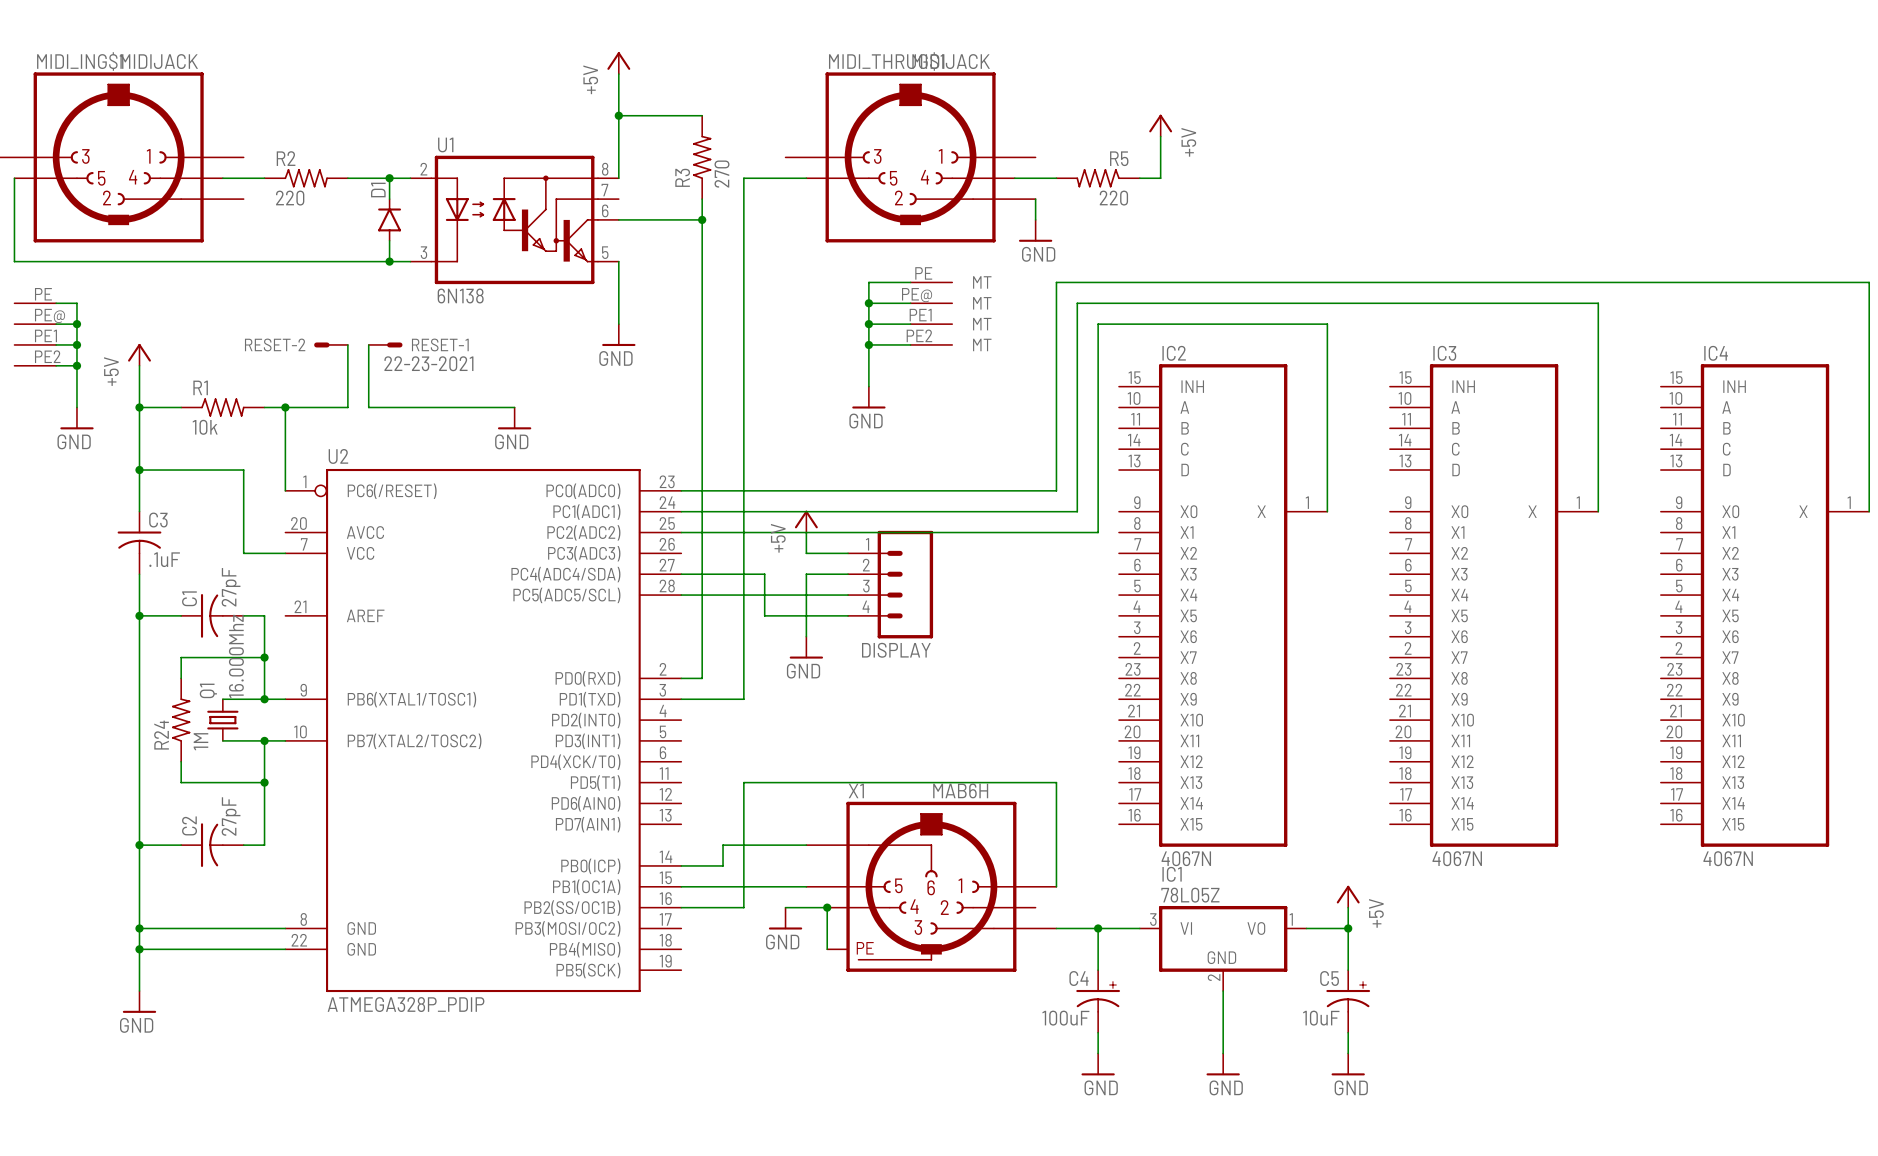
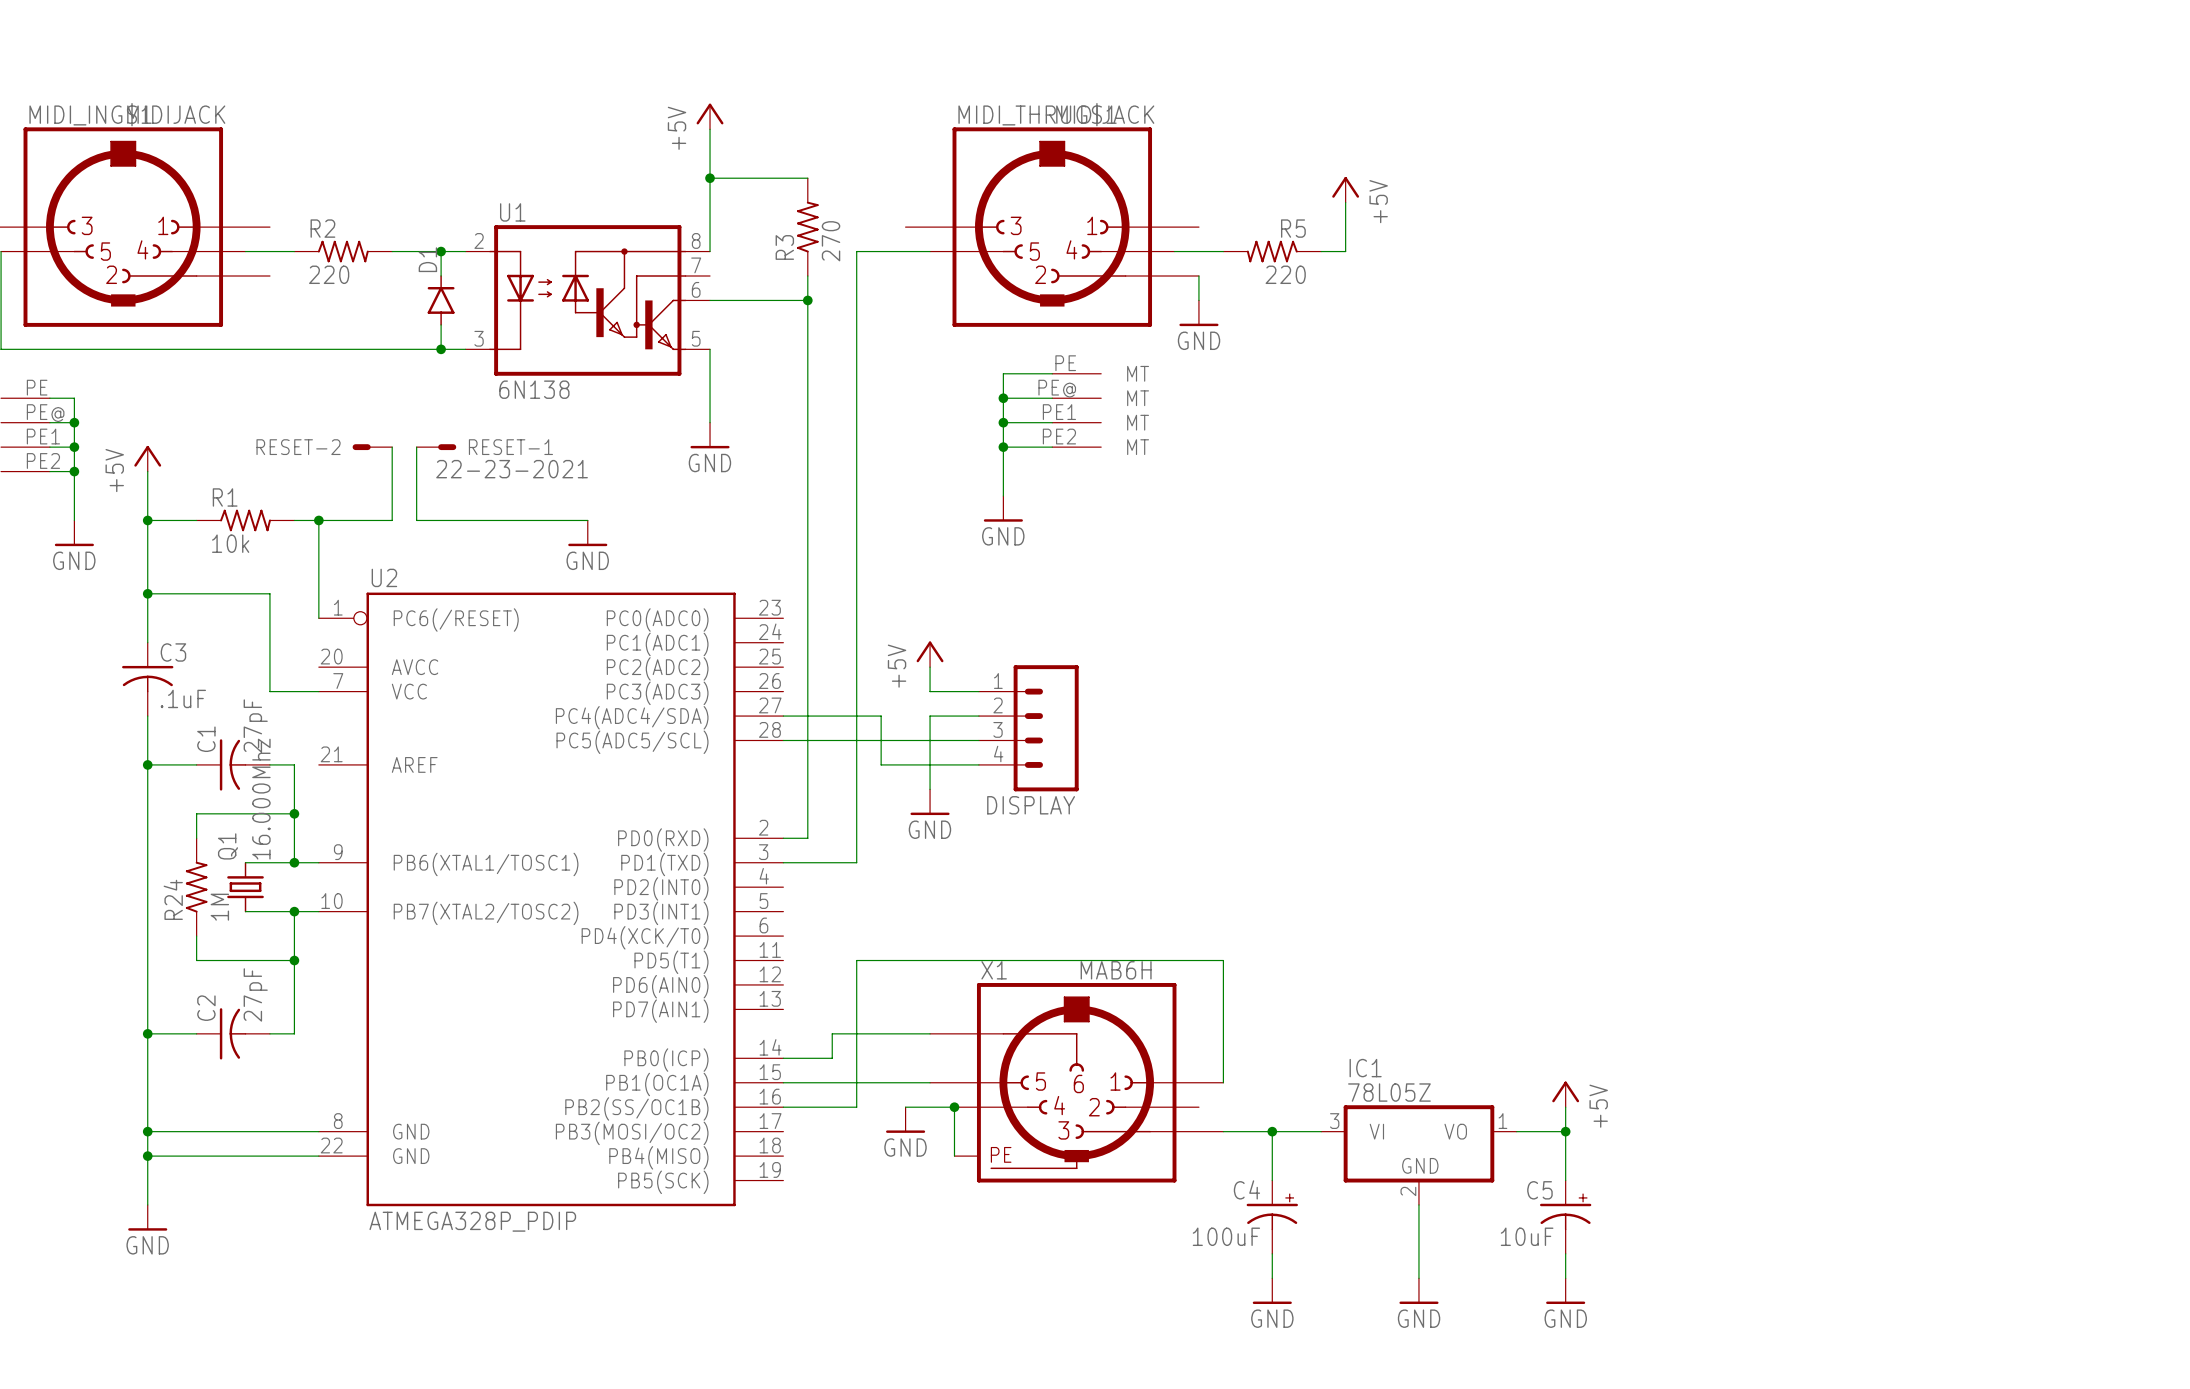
wire: (681, 490) (1056, 490) (1056, 282) (1869, 282) (1869, 511) -> none
wire: (681, 511) (1077, 511) (1077, 303) (1598, 303) (1598, 511) -> none
wire: (1327, 511) (1327, 324) (1098, 324) (1098, 532) (681, 532) -> none
IC2: 4067N (1223, 605) -> none
IC3: 4067N (1494, 605) -> none
IC4: 4067N (1765, 605) -> none

